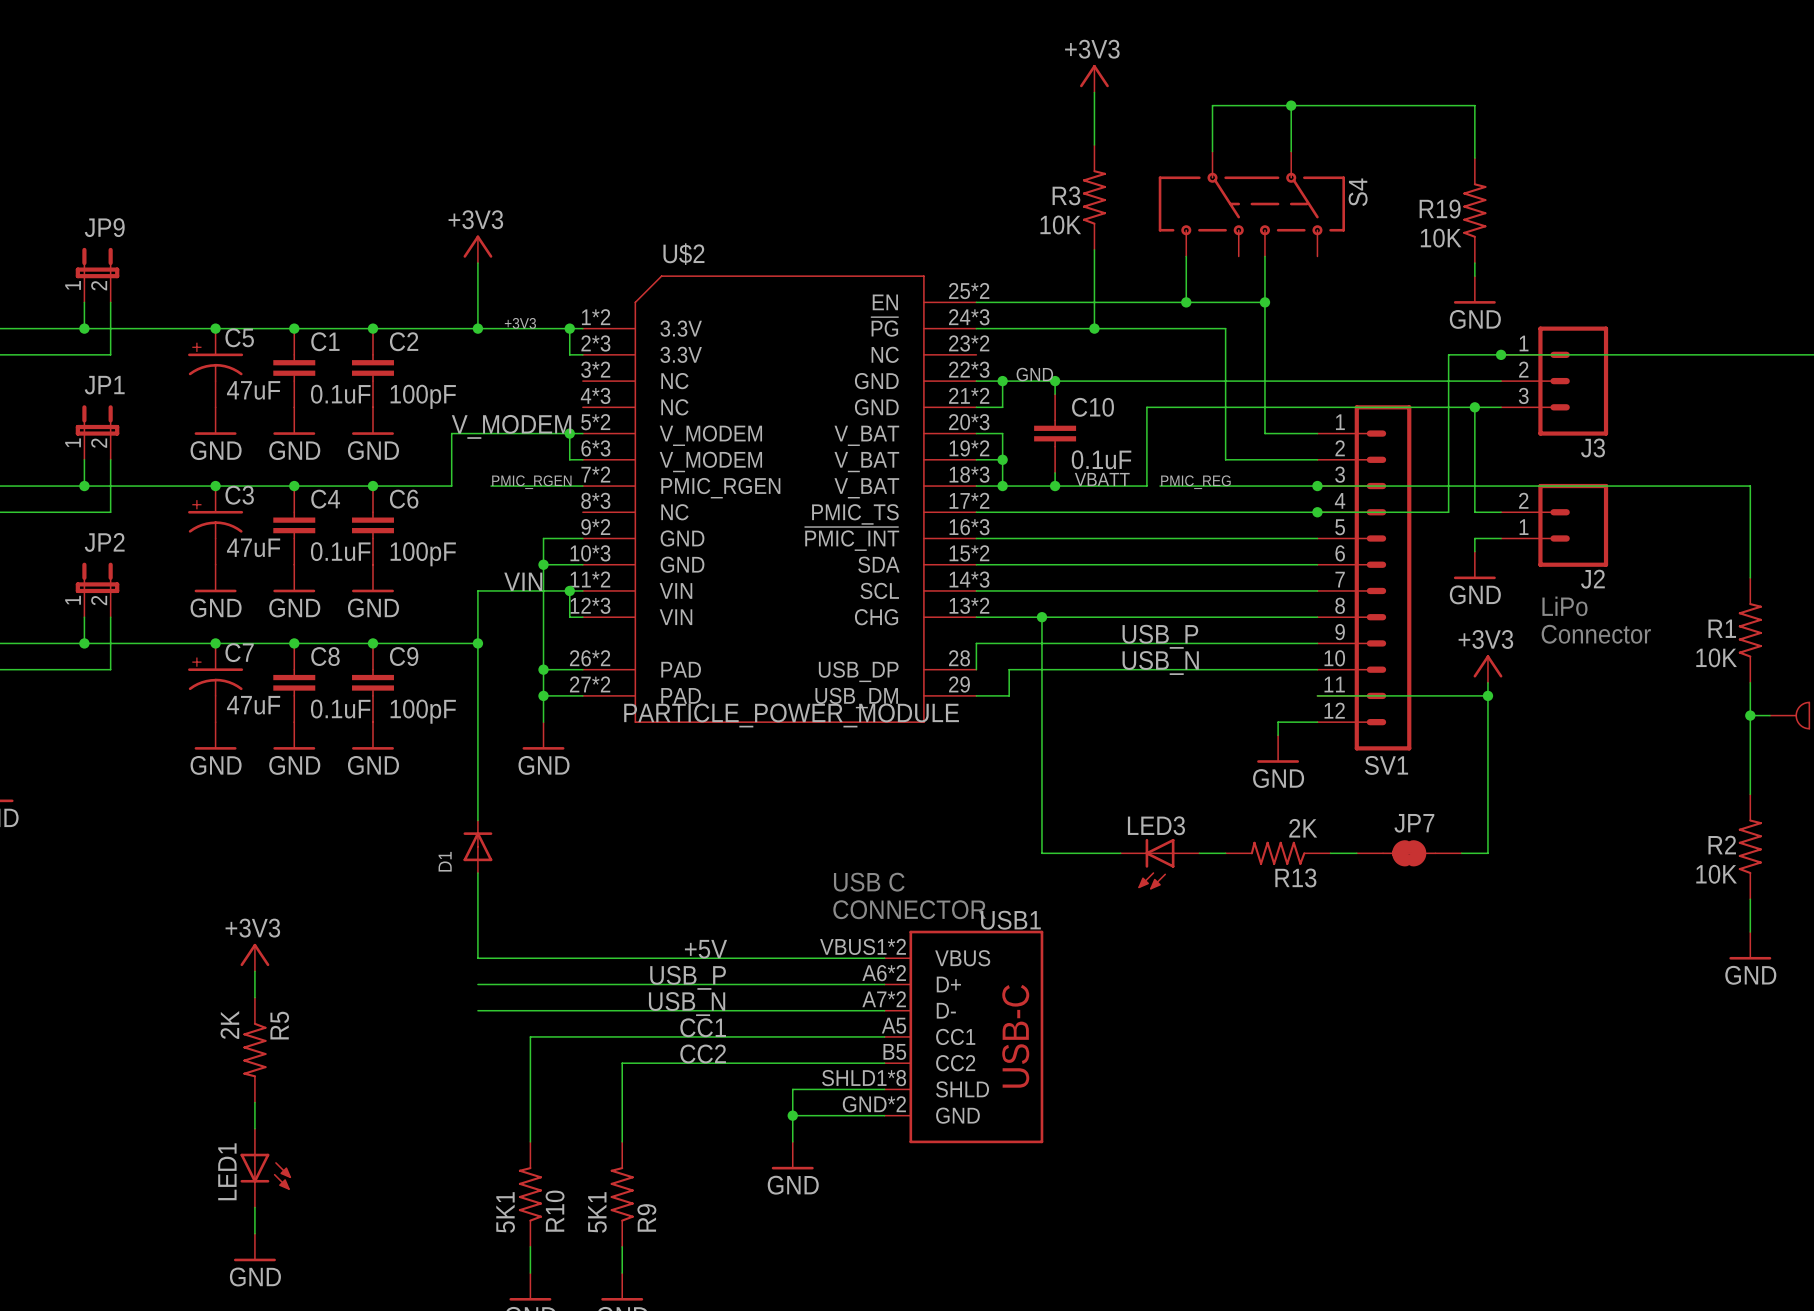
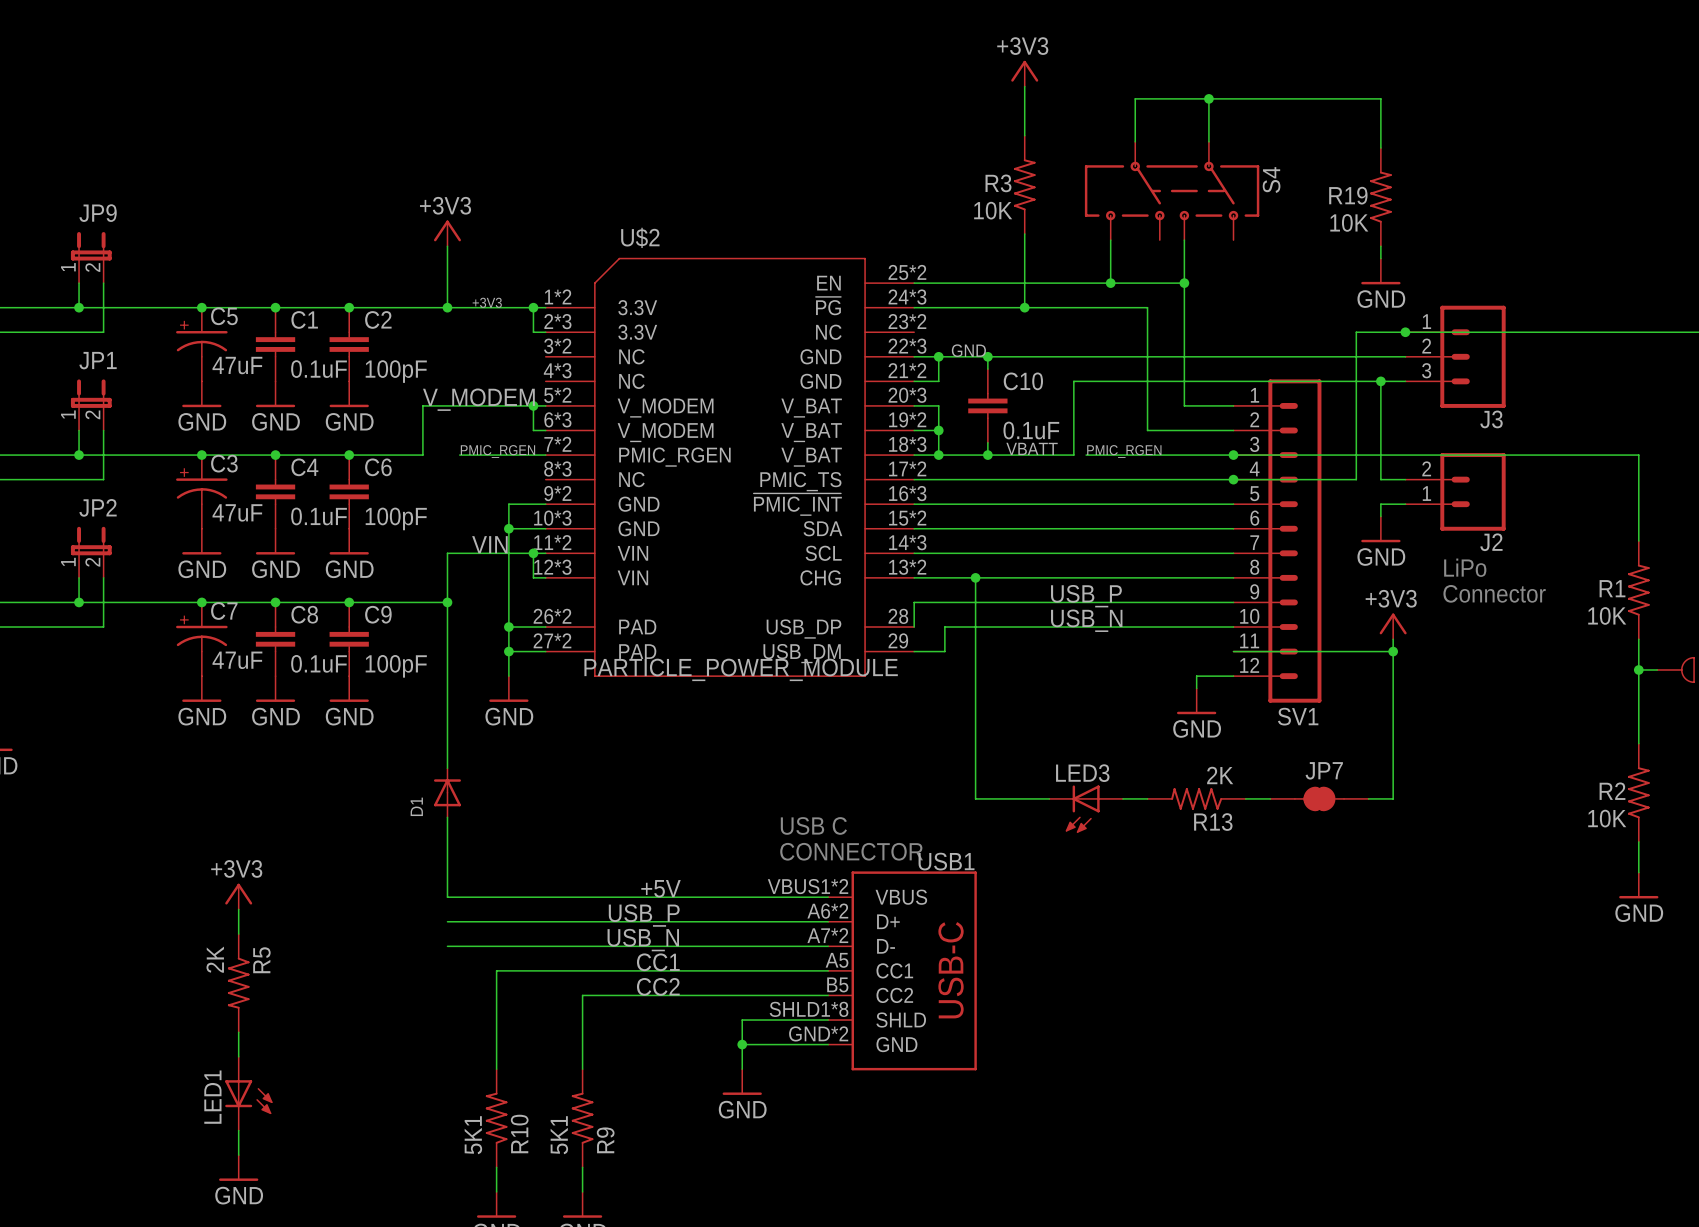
label: PMIC_REG (1195, 482) -> PMIC_RGEN (1124, 451)

